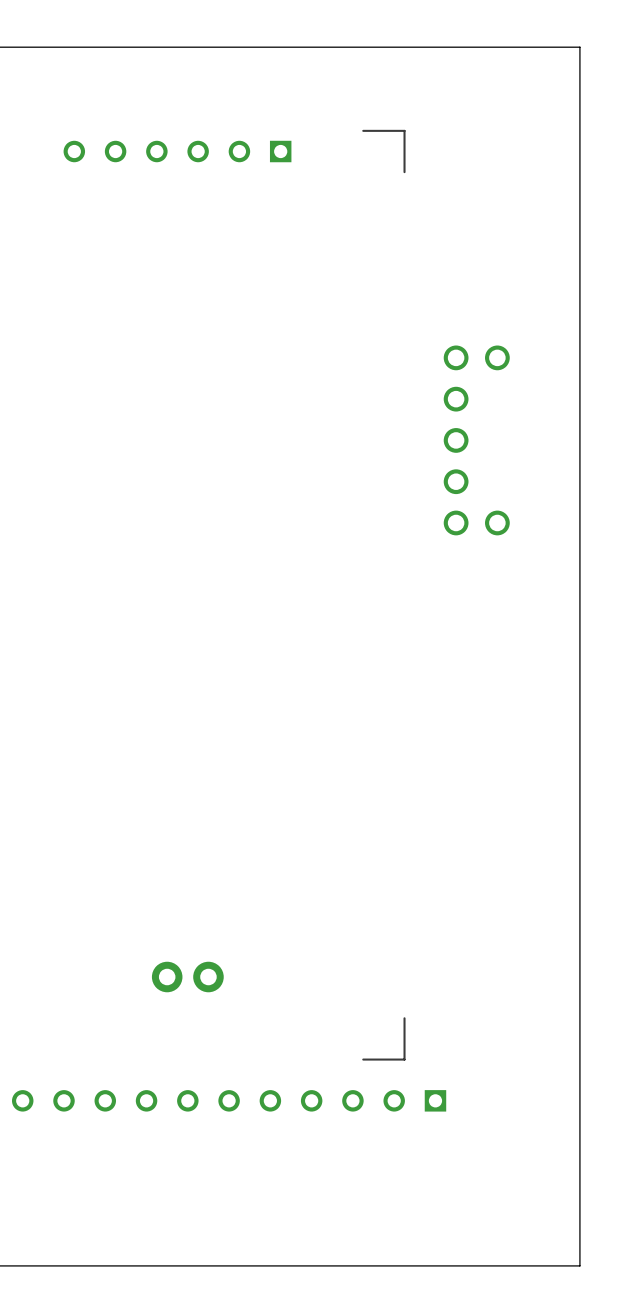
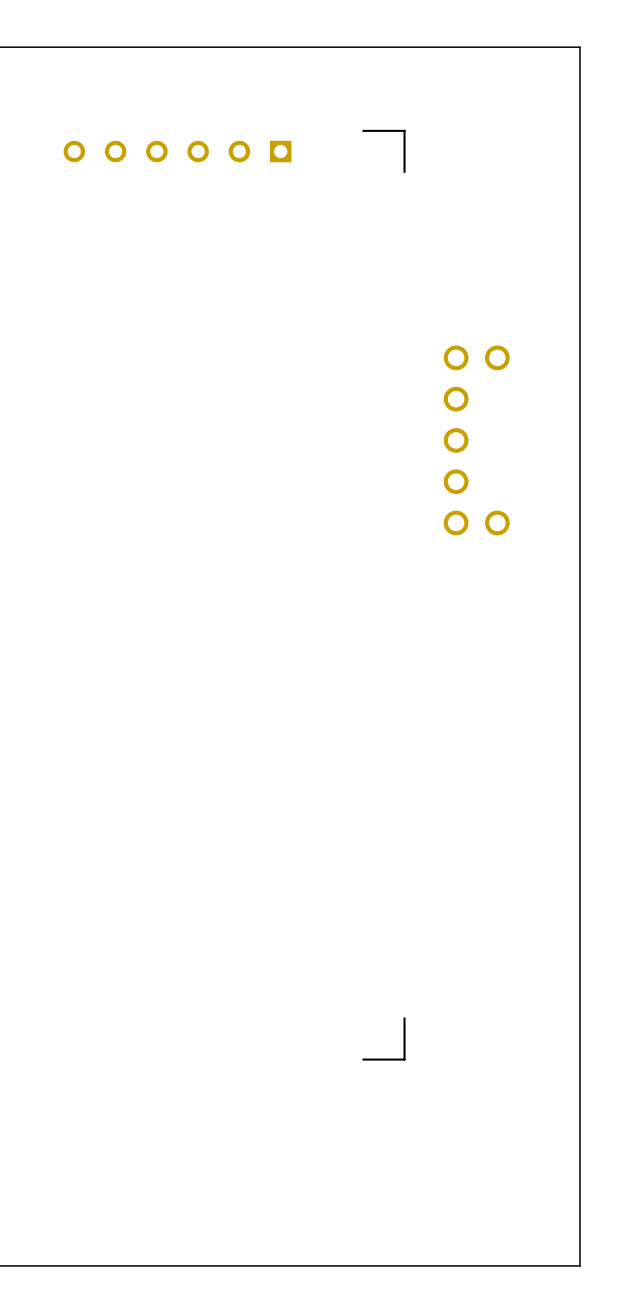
part: (187, 977) -> none
part: (229, 1100) -> none

